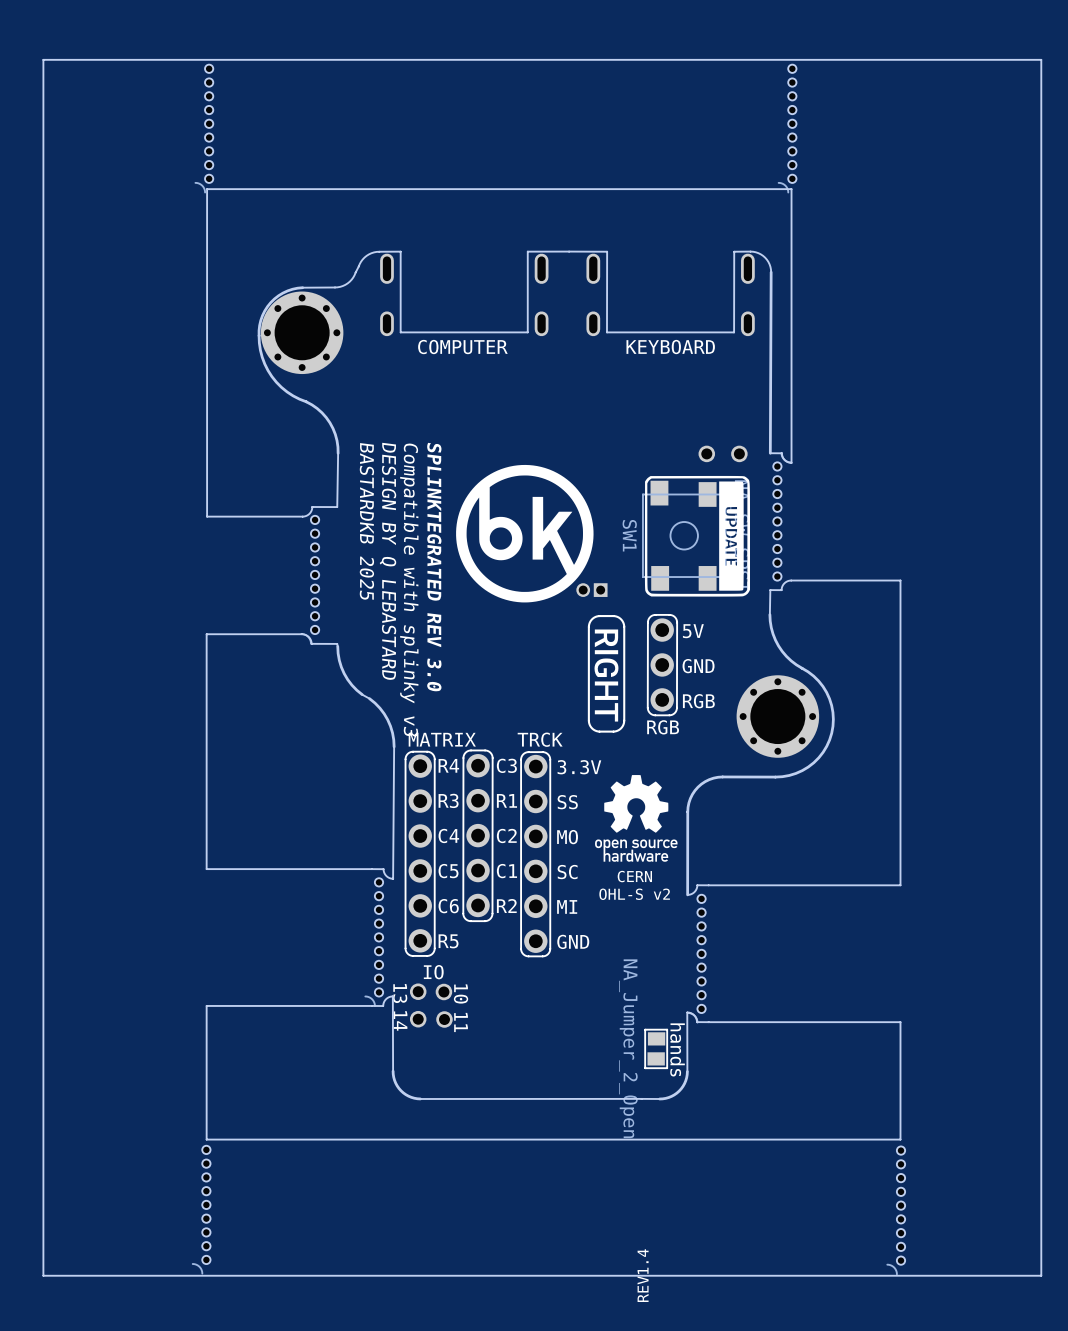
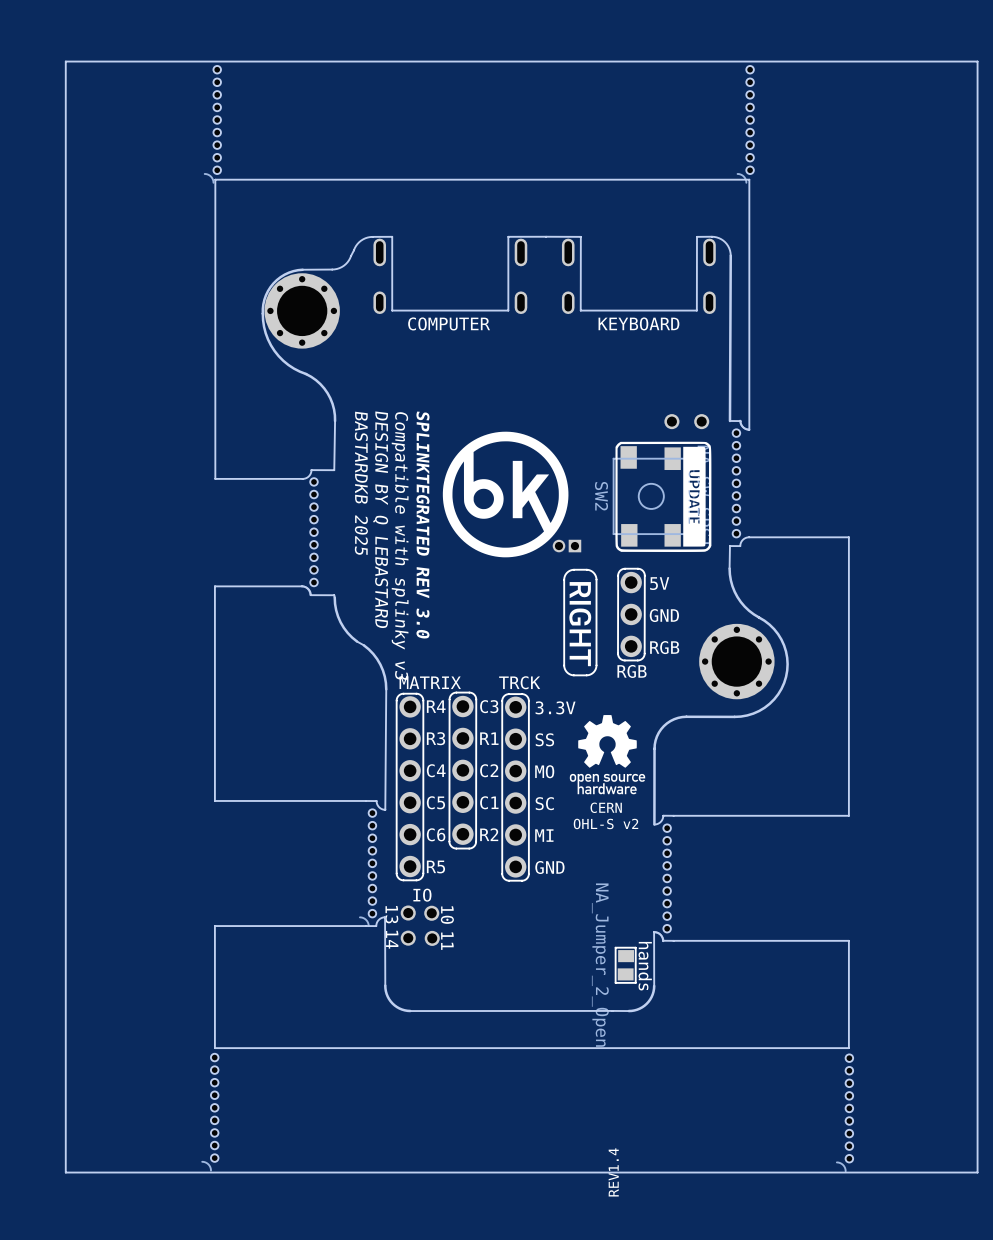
SW1 name: SW1 (629, 535) -> SW2 (601, 496)

